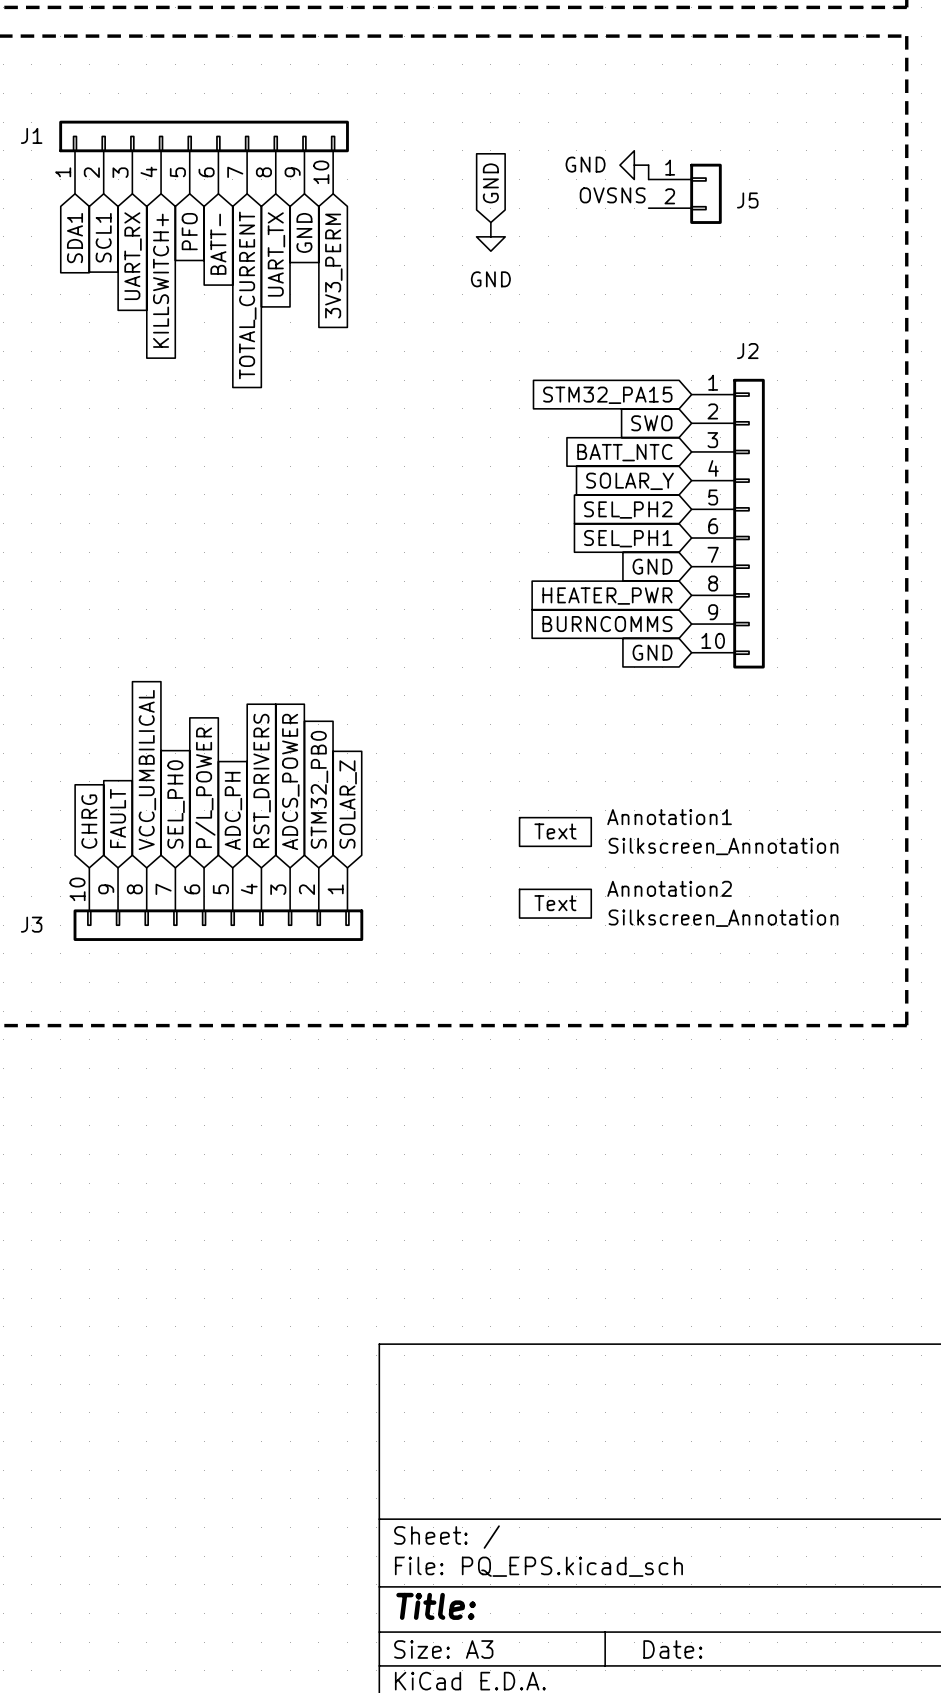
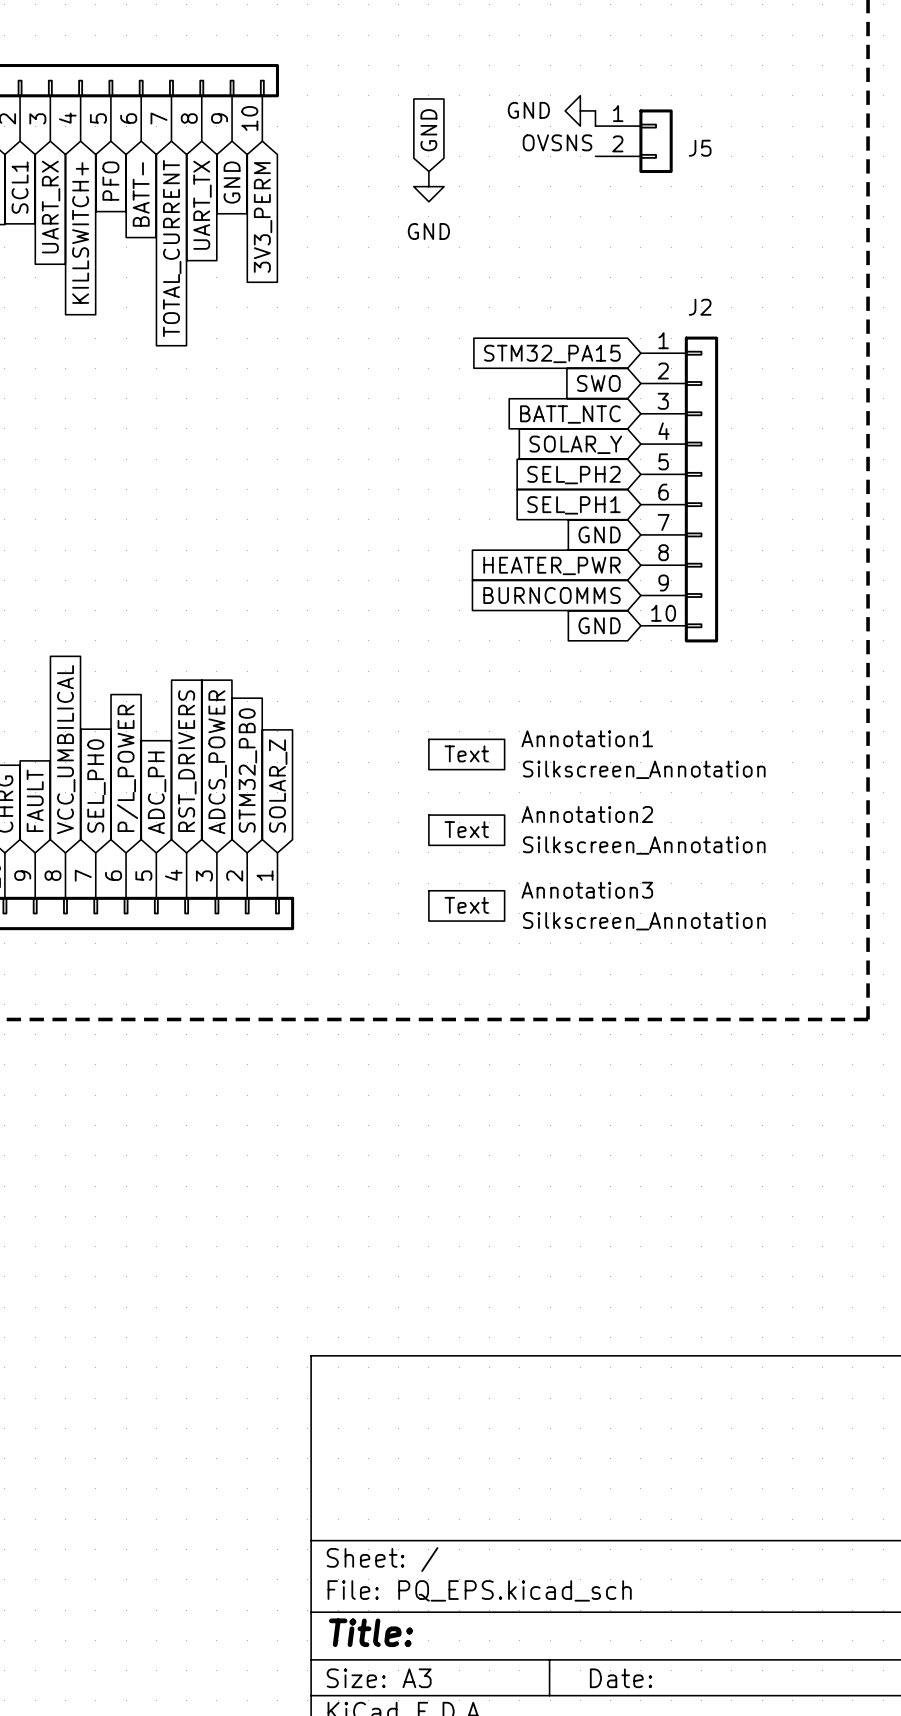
Annotation1 position: (555, 831) -> (466, 754)
Annotation2 position: (555, 903) -> (466, 830)
Annotation3: none -> Silkscreen_Annotation (466, 905)

